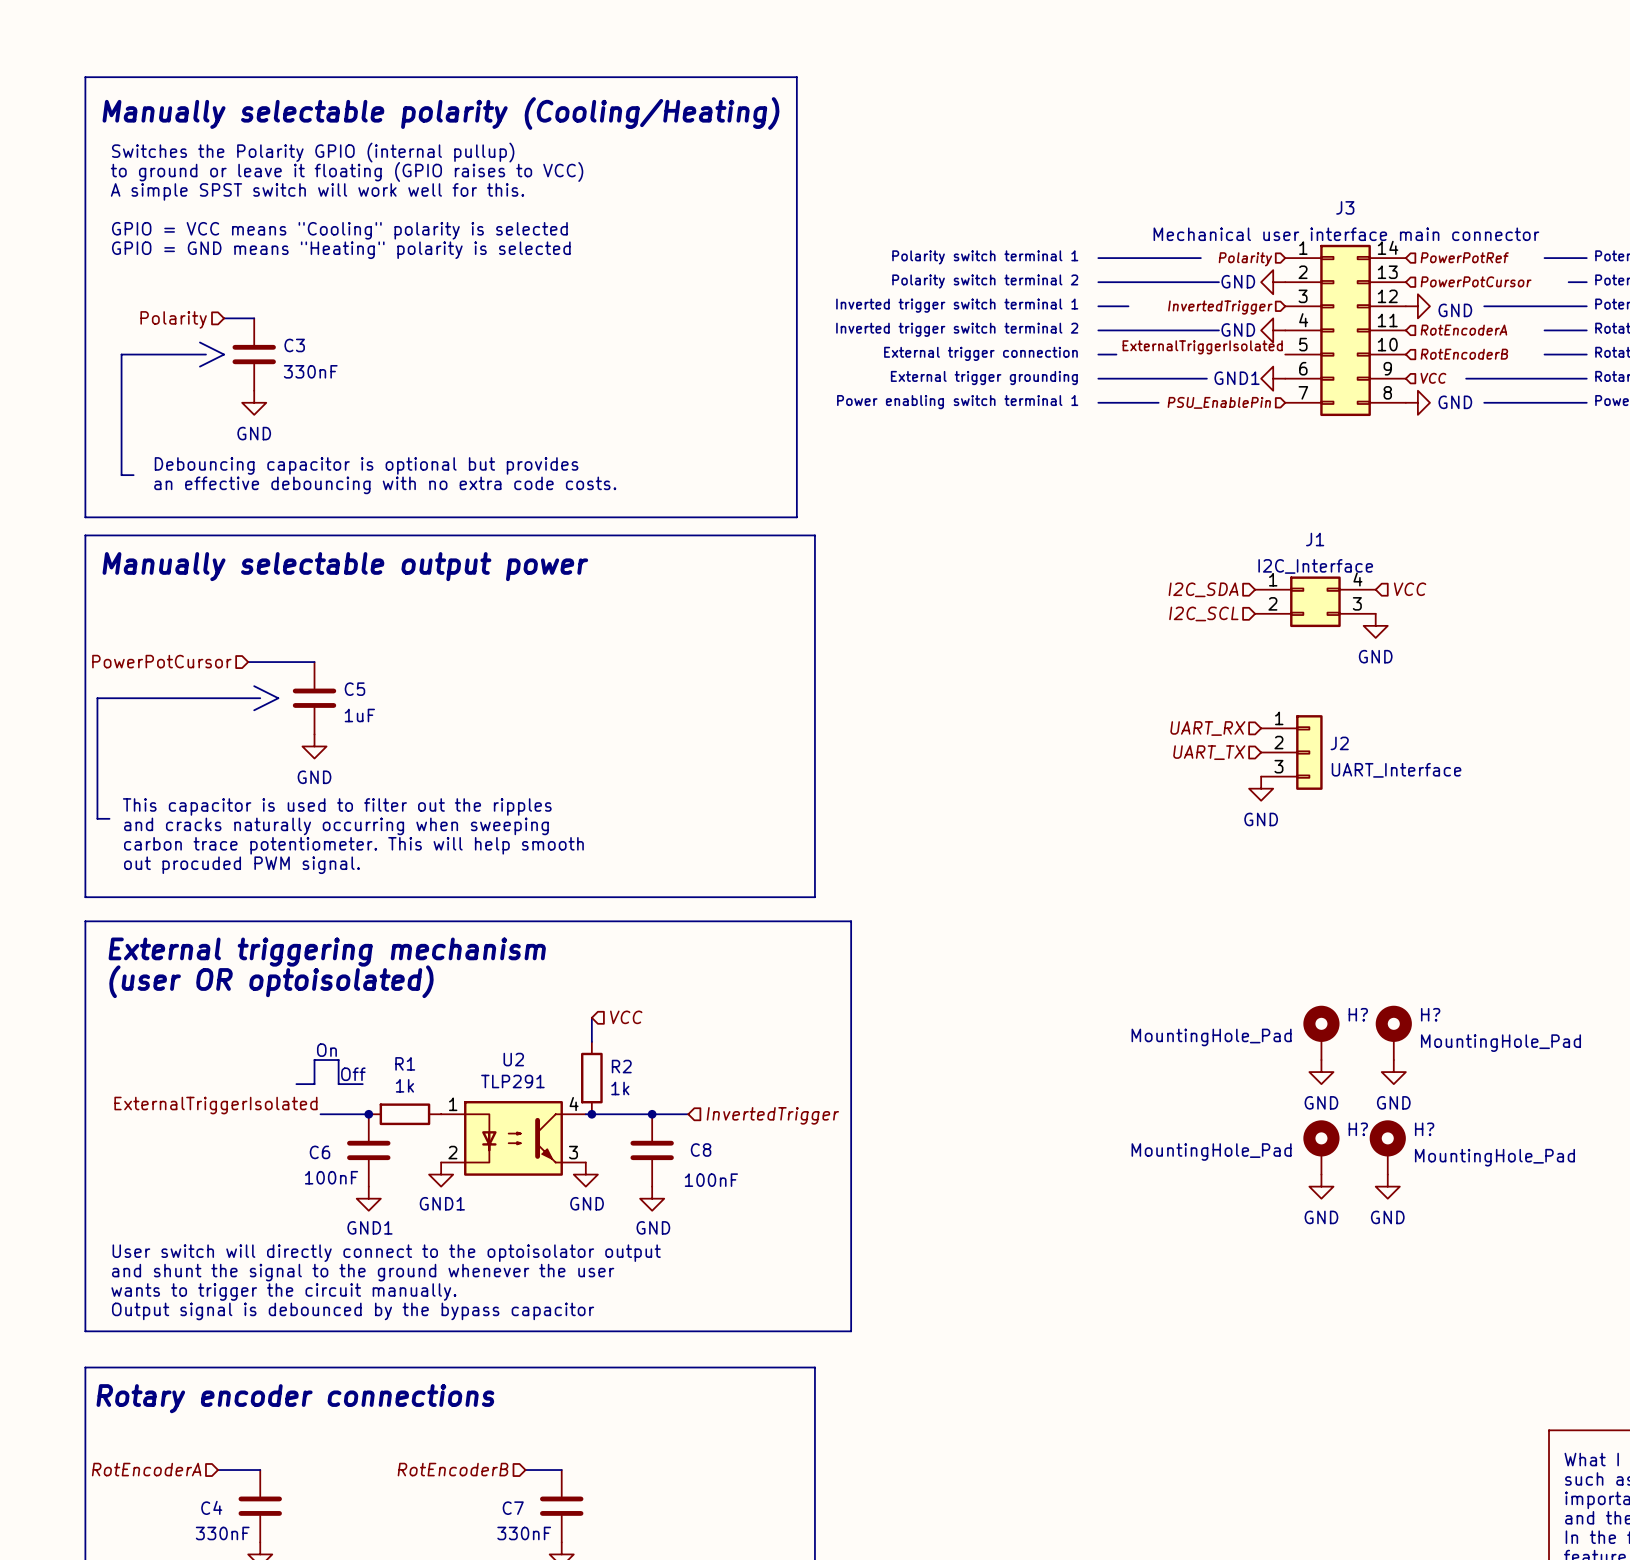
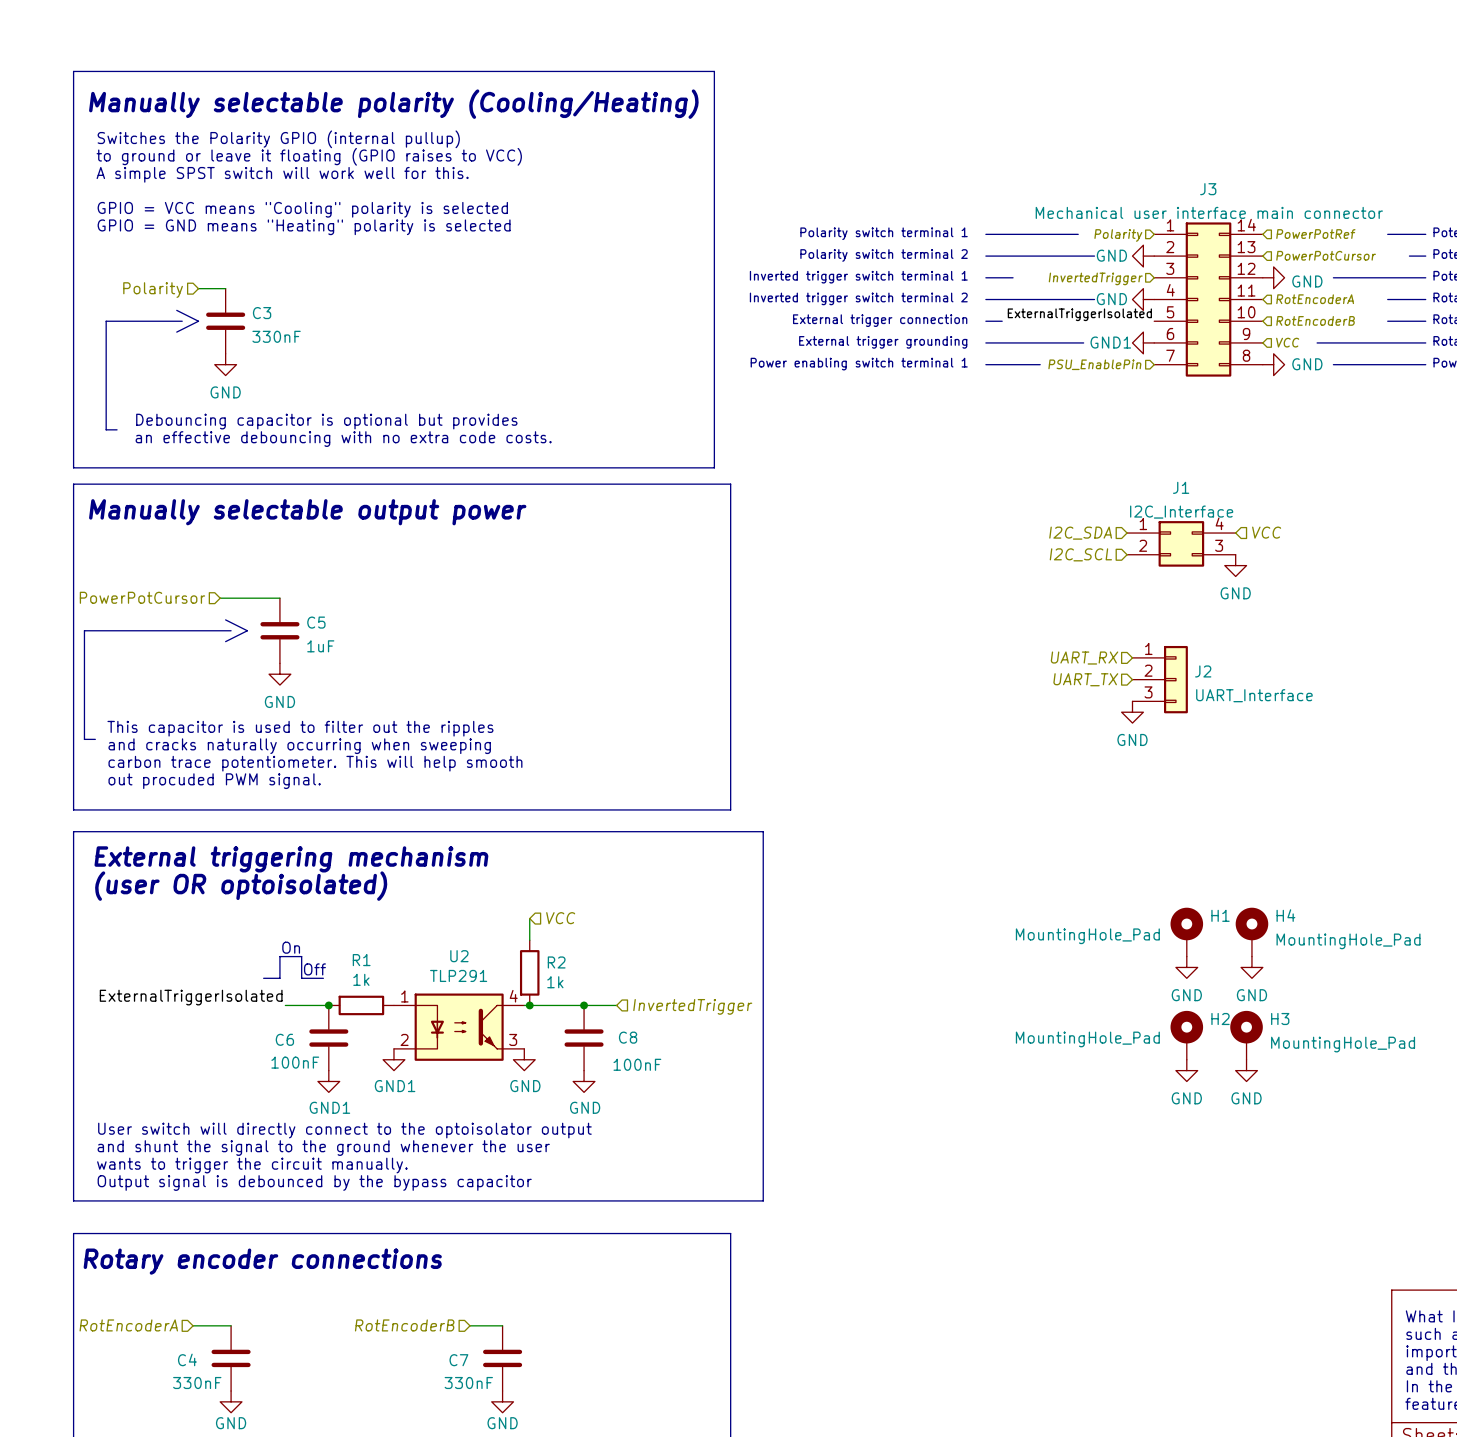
H? name: H? (1358, 1014) -> H1 (1220, 915)
H? name: H? (1430, 1014) -> H4 (1285, 915)
H? name: H? (1358, 1129) -> H2 (1220, 1019)
H? name: H? (1424, 1129) -> H3 (1280, 1019)

